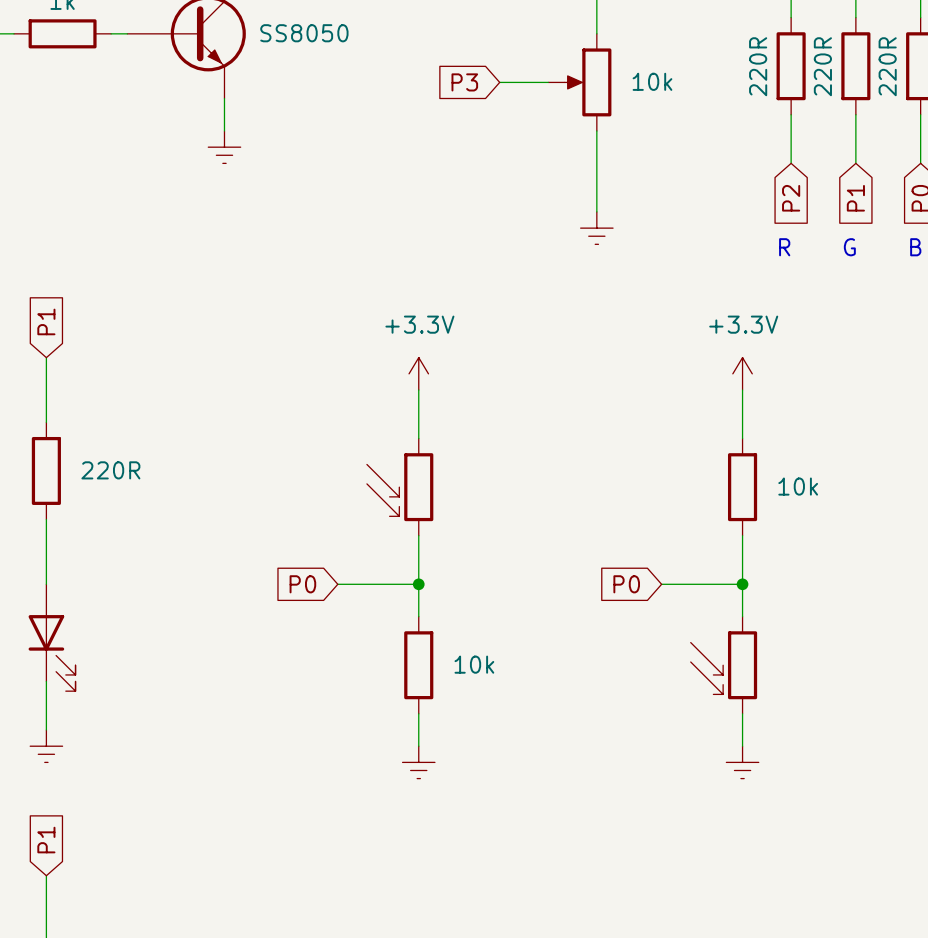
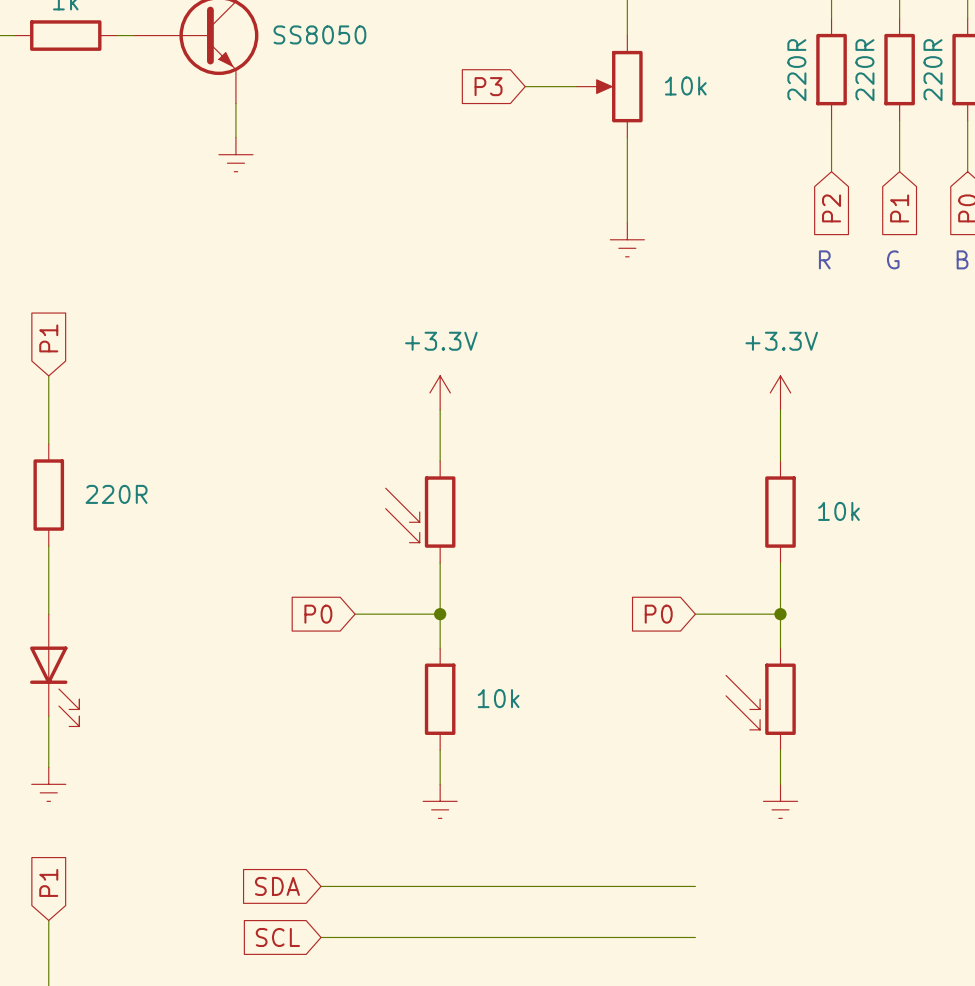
global label: none -> SDA (277, 886)
wire: none -> (321, 886) (695, 886)
global label: none -> SCL (277, 937)
wire: none -> (321, 937) (695, 937)

